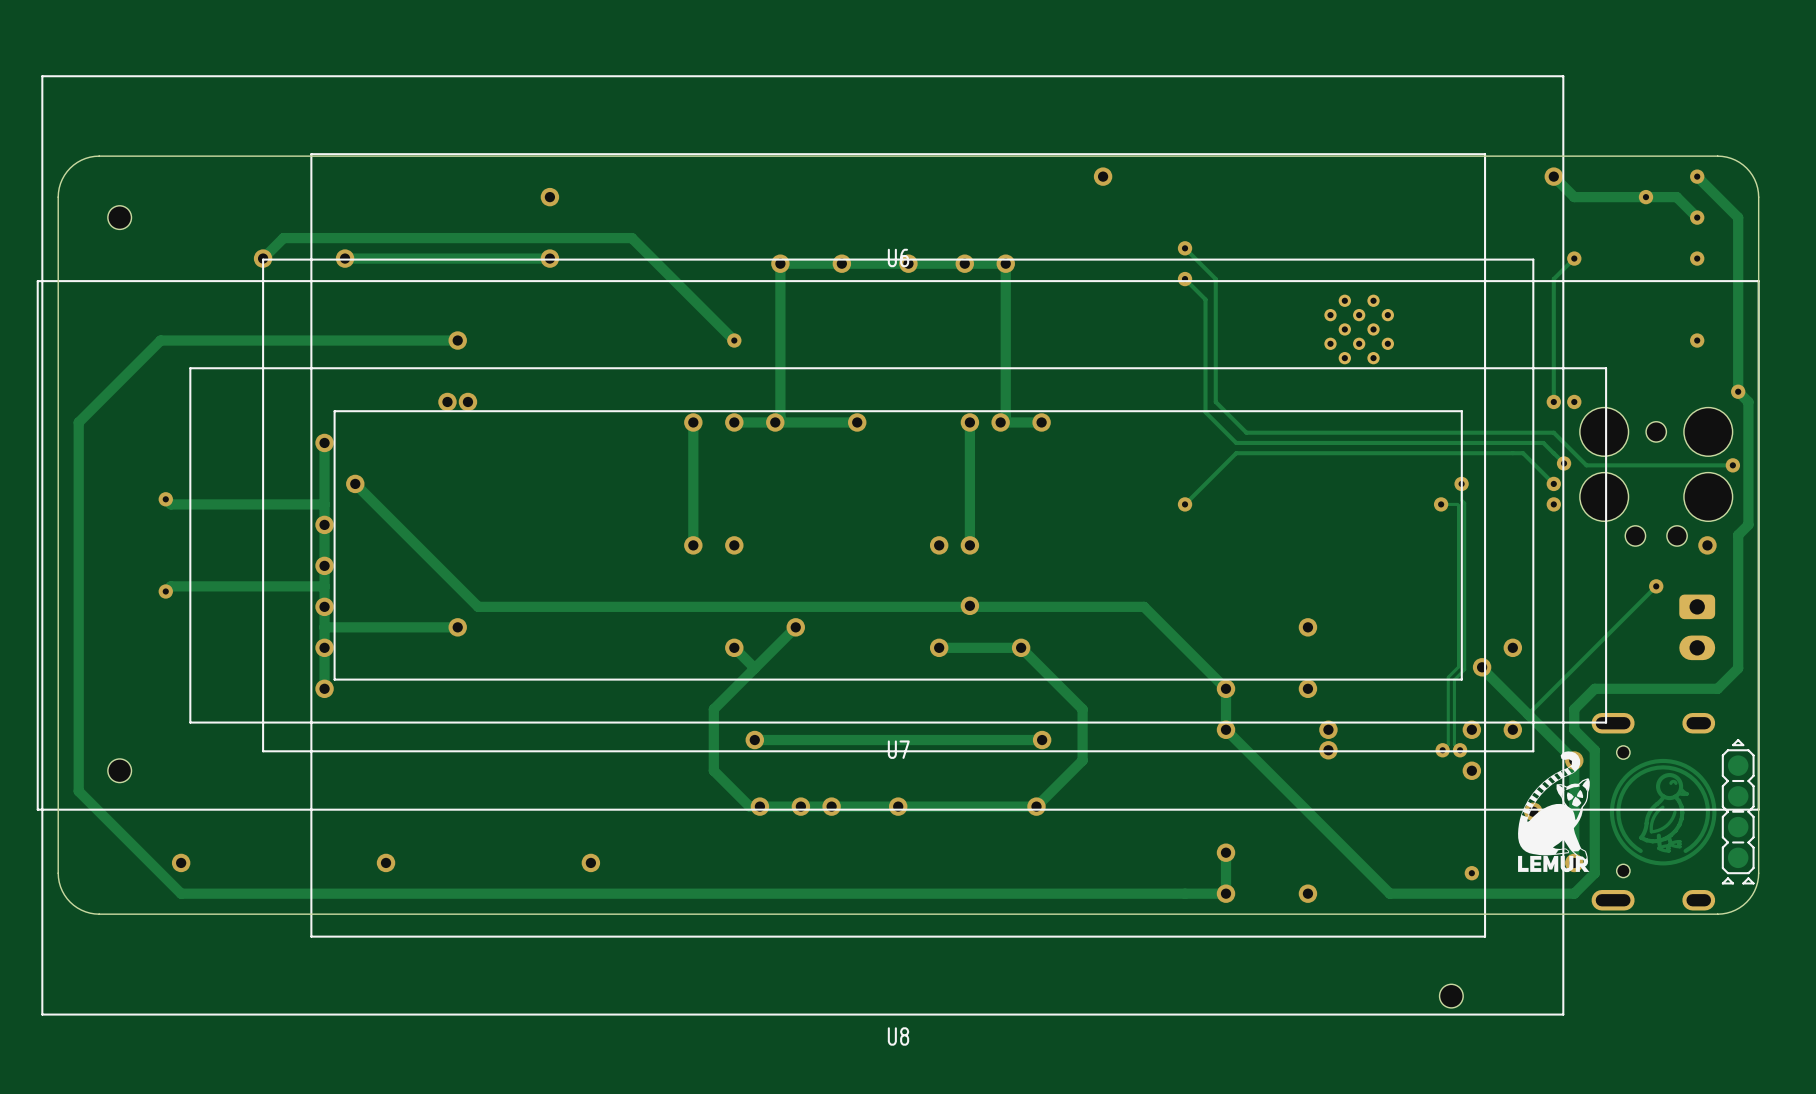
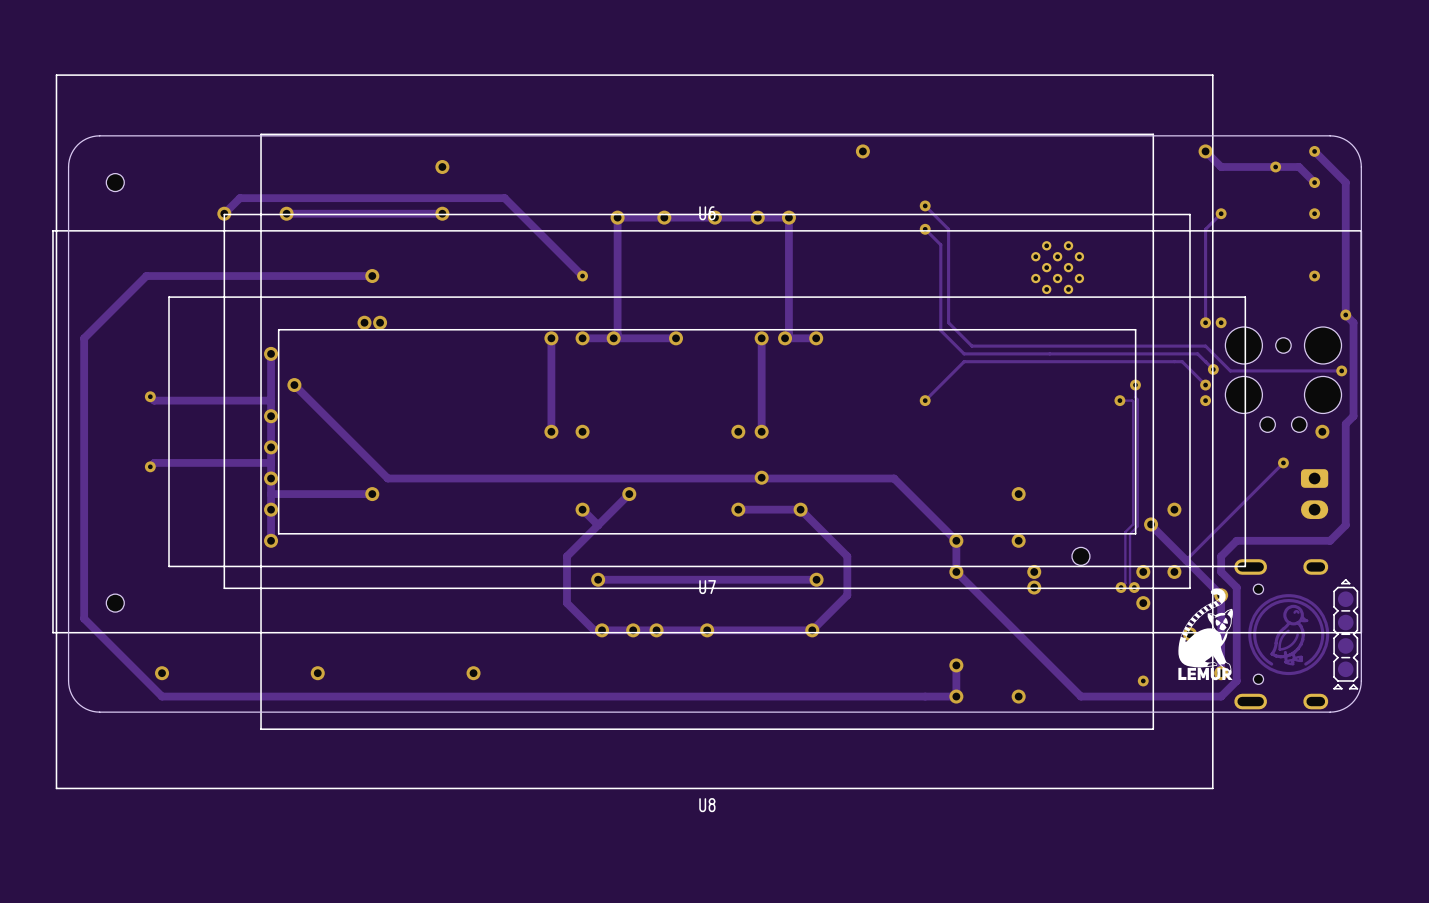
part position: (1451, 996) -> (1080, 556)

